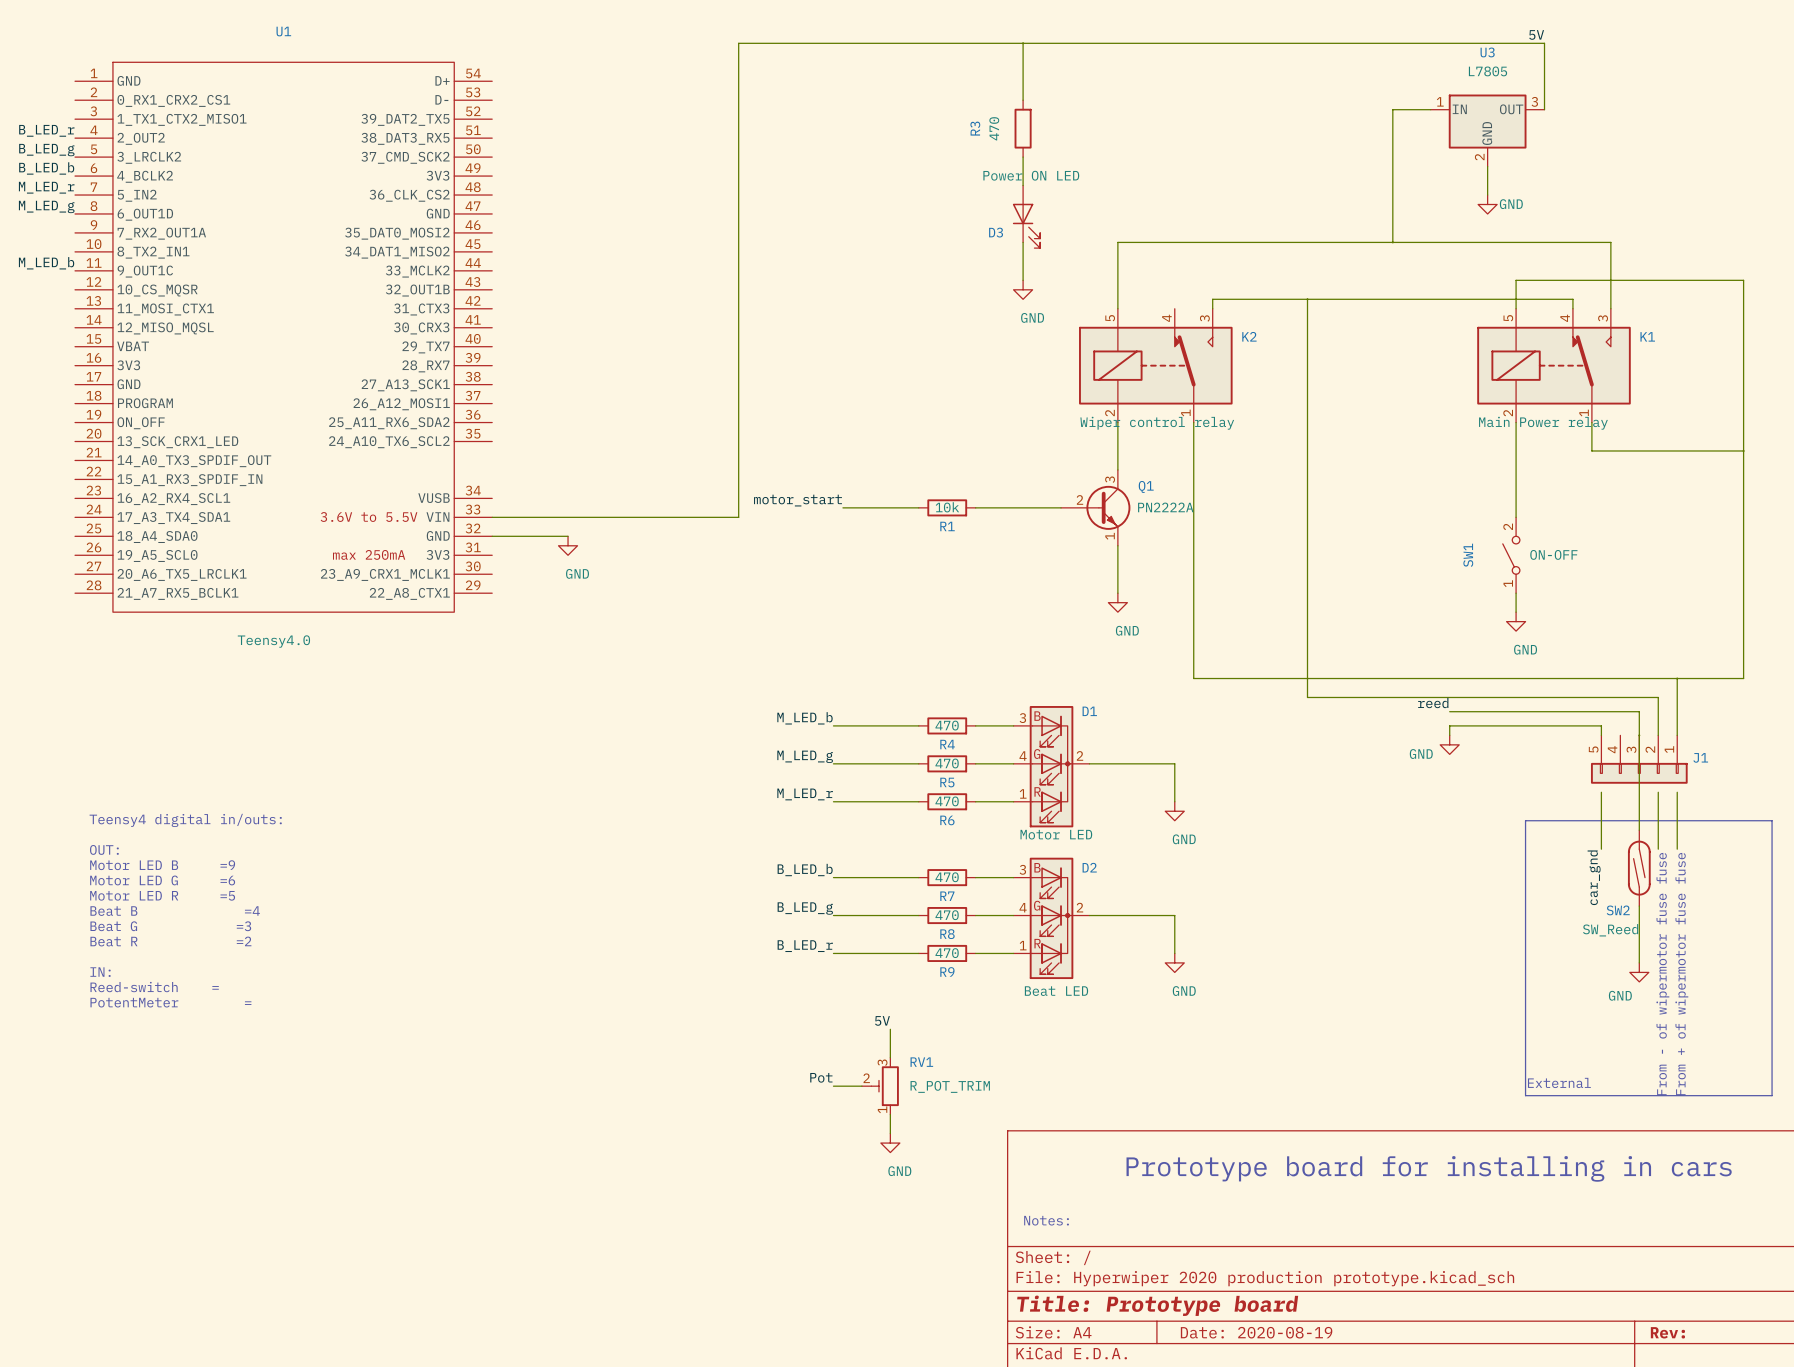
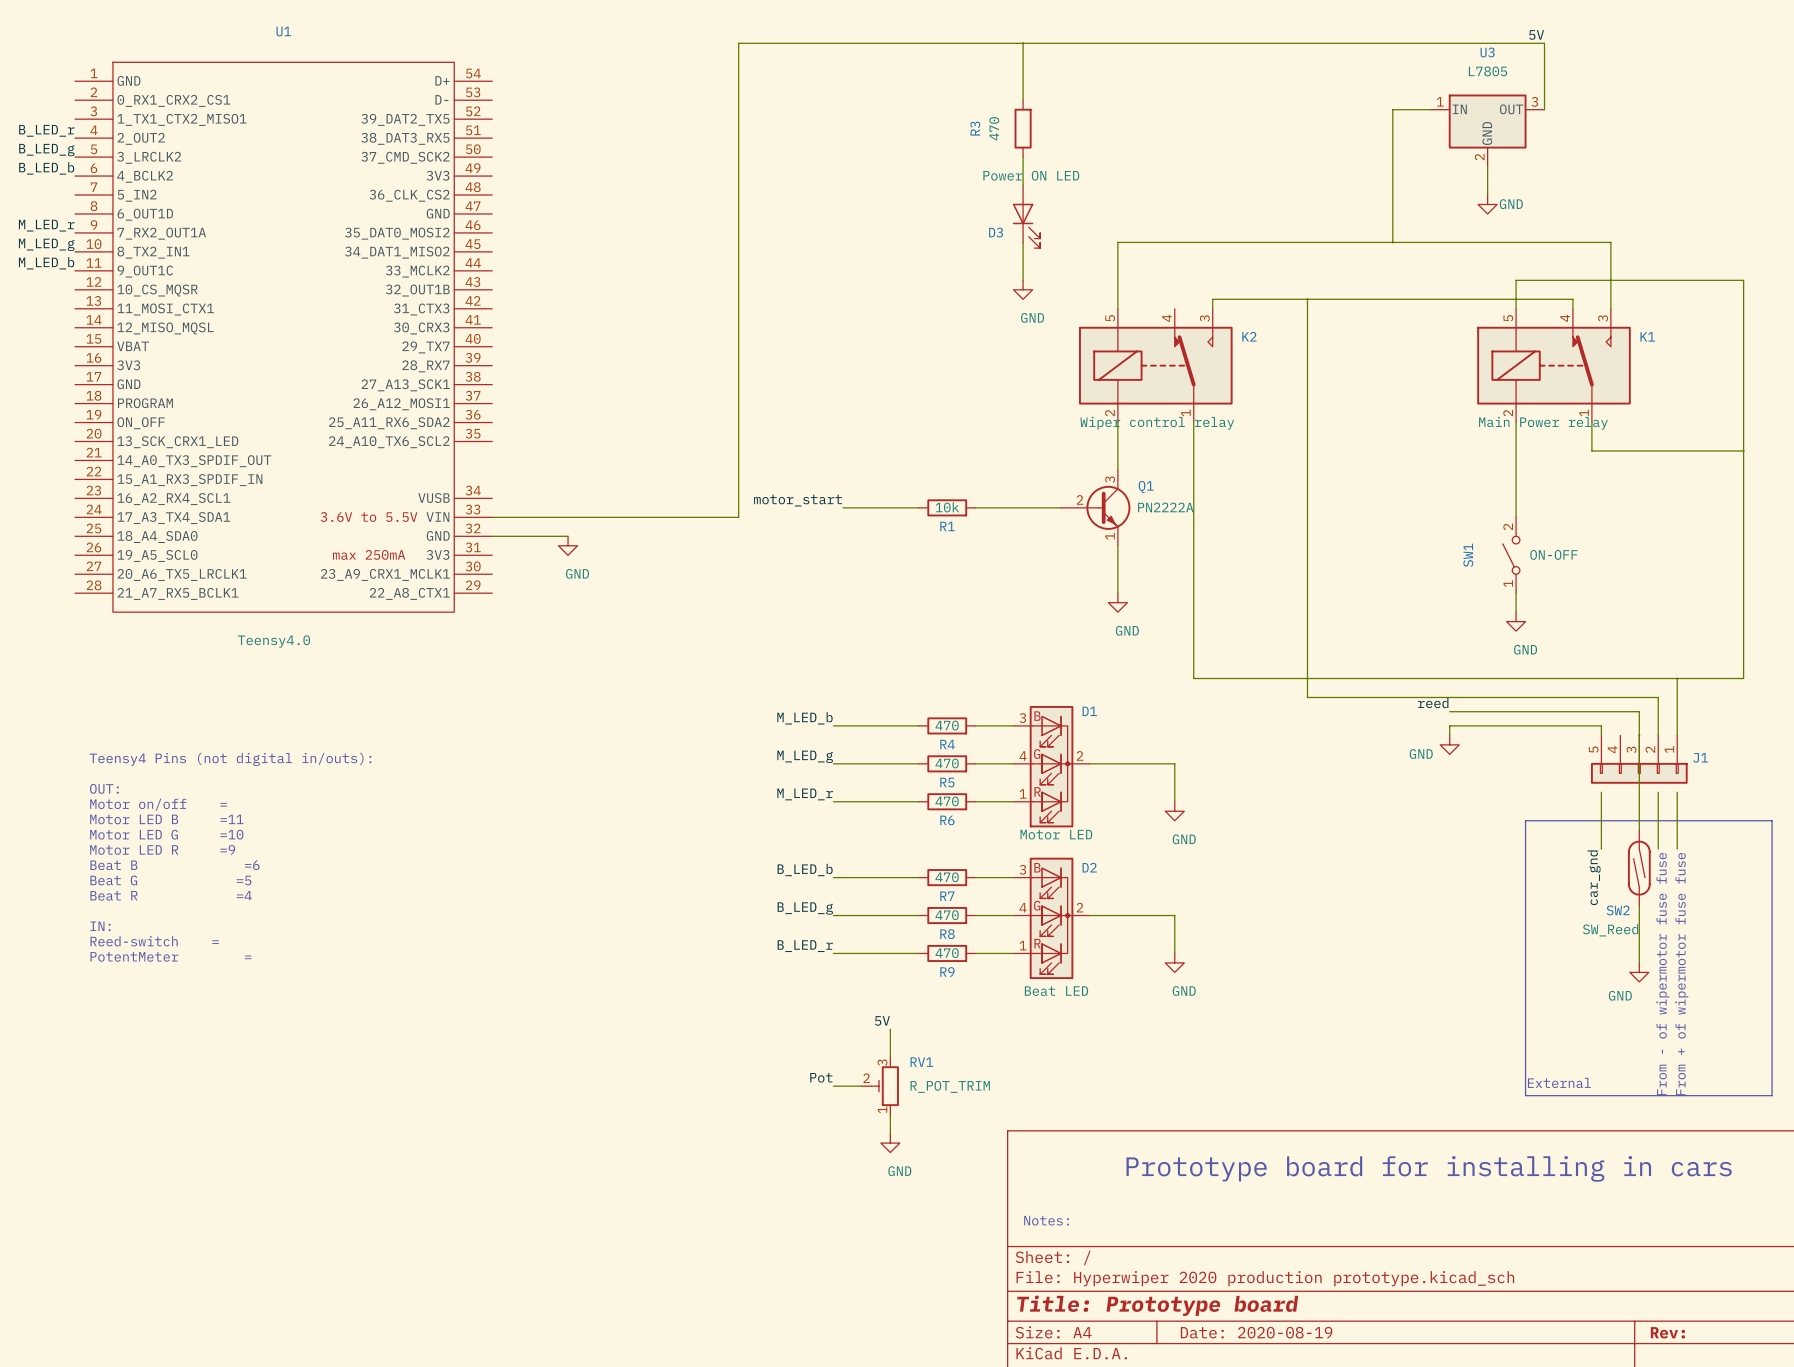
label position: M_LED_r (46, 187) -> M_LED_r (46, 225)
label position: M_LED_g (46, 206) -> M_LED_g (46, 244)
text: none -> Teensy4 Pins (not digital in/outs): (230, 759)
text: none -> OUT: (104, 788)
text: none -> Motor on/off = (158, 804)
text: Teensy4 digital in/outs: (185, 820) -> Motor LED B =11 (166, 819)
text: none -> Motor LED G =10 (166, 834)
text: OUT: (104, 849) -> Motor LED R =9 (162, 849)
text: Motor LED B =9 (162, 865) -> Beat B =6 (174, 865)
text: Motor LED G =6 (162, 880) -> Beat G =5 (170, 880)
text: Motor LED R =5 (162, 895) -> Beat R =4 (171, 895)
text: Beat B =4 (175, 911) -> none
text: Beat G =3 (170, 926) -> IN: (100, 926)
text: Beat R =2 (170, 941) -> Reed-switch = (154, 941)
text: IN: (100, 972) -> none
text: Reed-switch = (154, 987) -> none
text position: PotentMeter = (170, 1002) -> PotentMeter = (170, 956)

